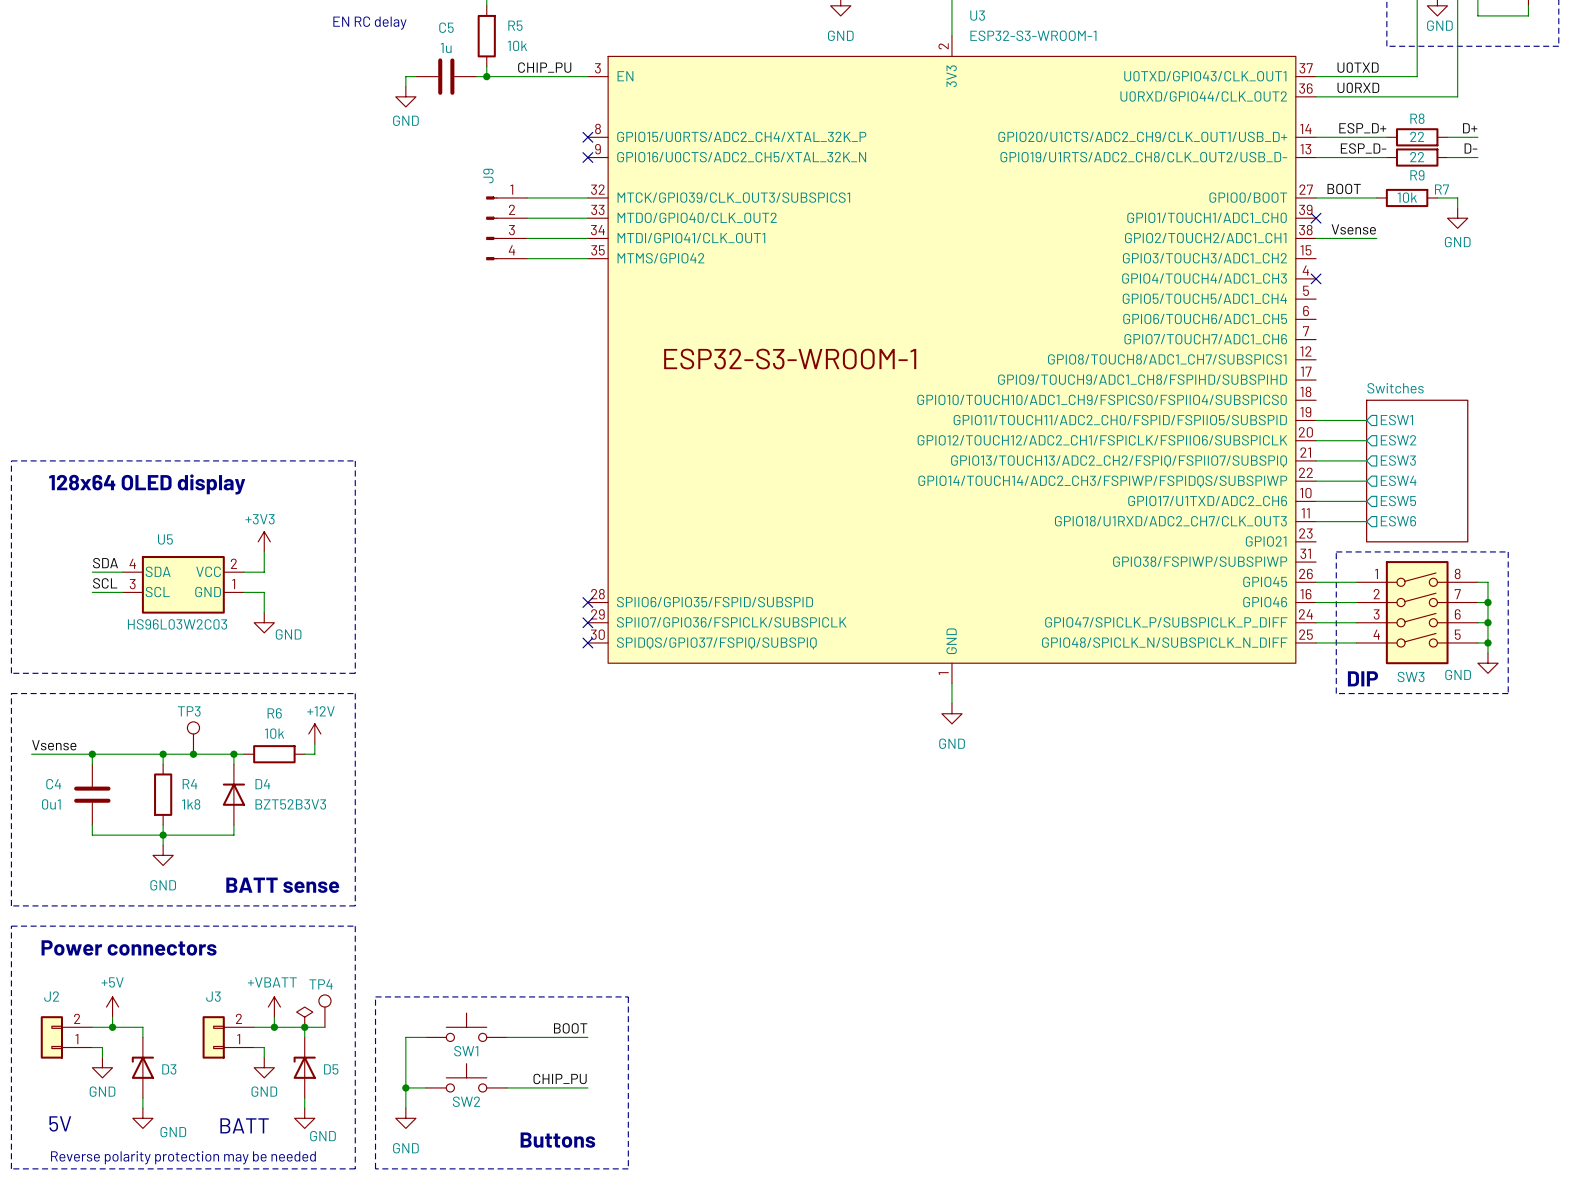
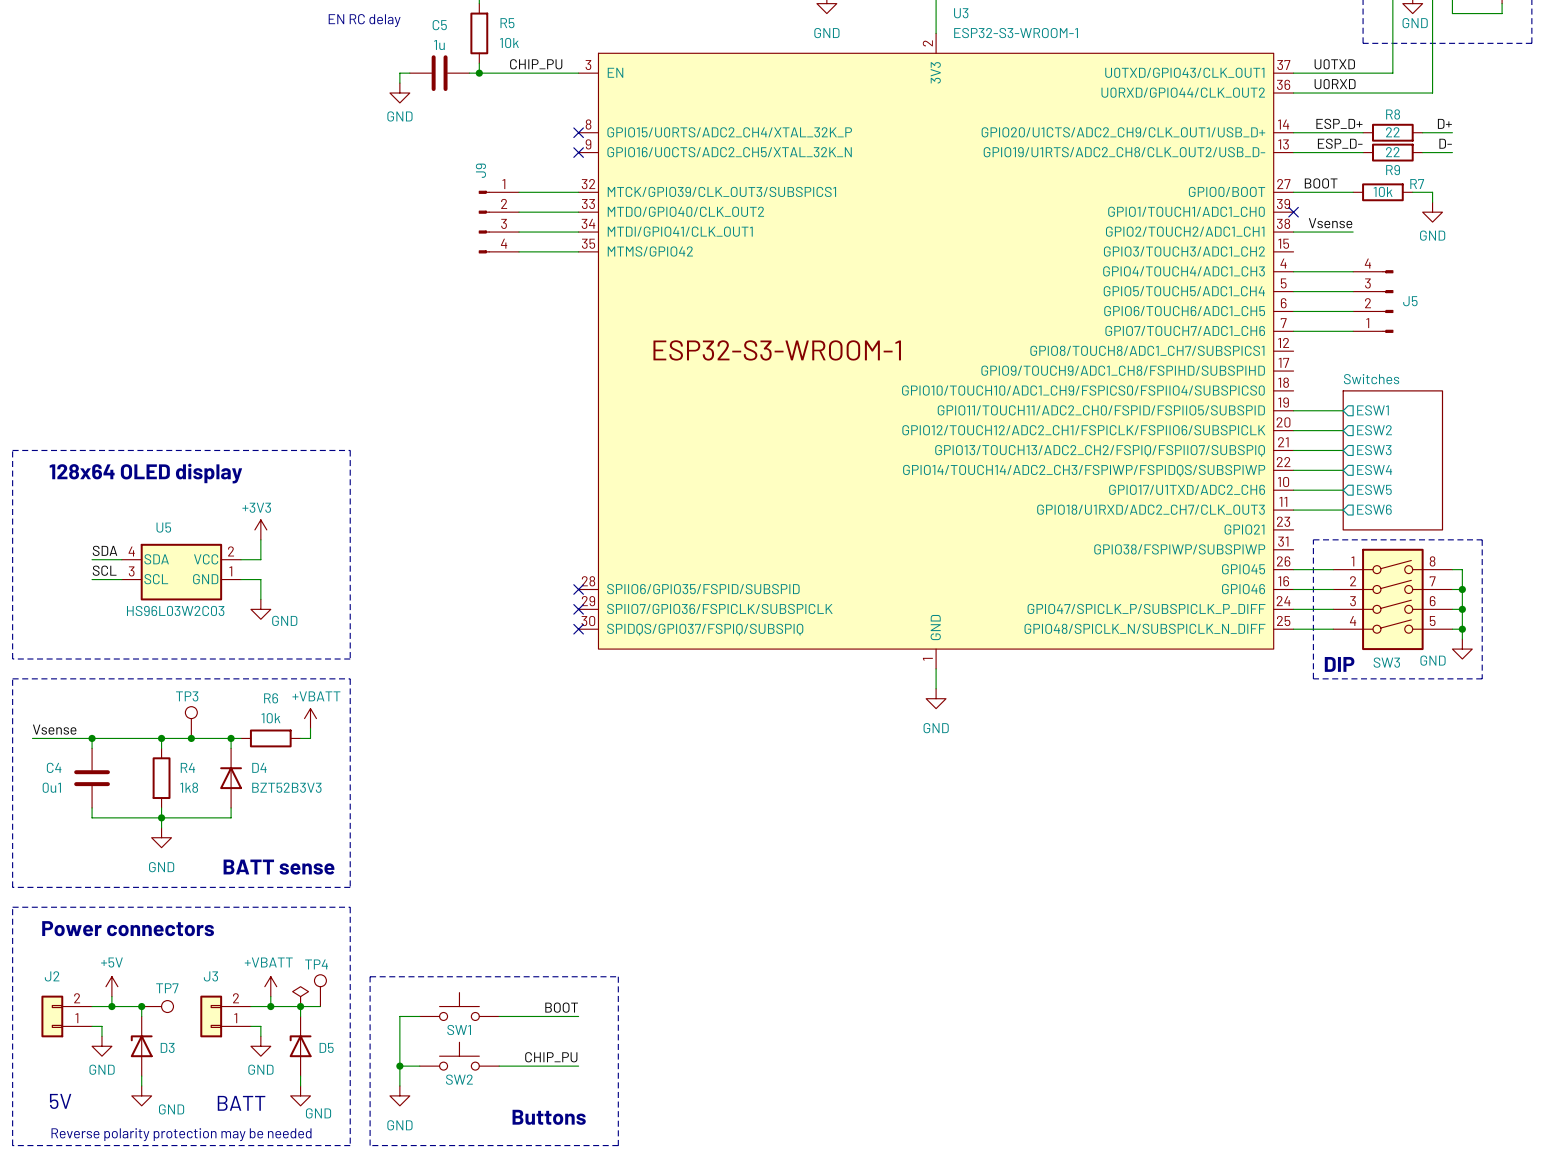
wire: none -> (1293, 271) (1353, 271)
no-connect mark: (1316, 278) -> none
wire: none -> (1293, 291) (1353, 291)
J5: none -> (1373, 301)
wire: none -> (1293, 311) (1353, 311)
wire: none -> (1293, 331) (1353, 331)
power symbol: +12V (314, 734) -> +VBATT (310, 718)
junction: none -> (141, 1006)
TP7: none -> (157, 1006)

